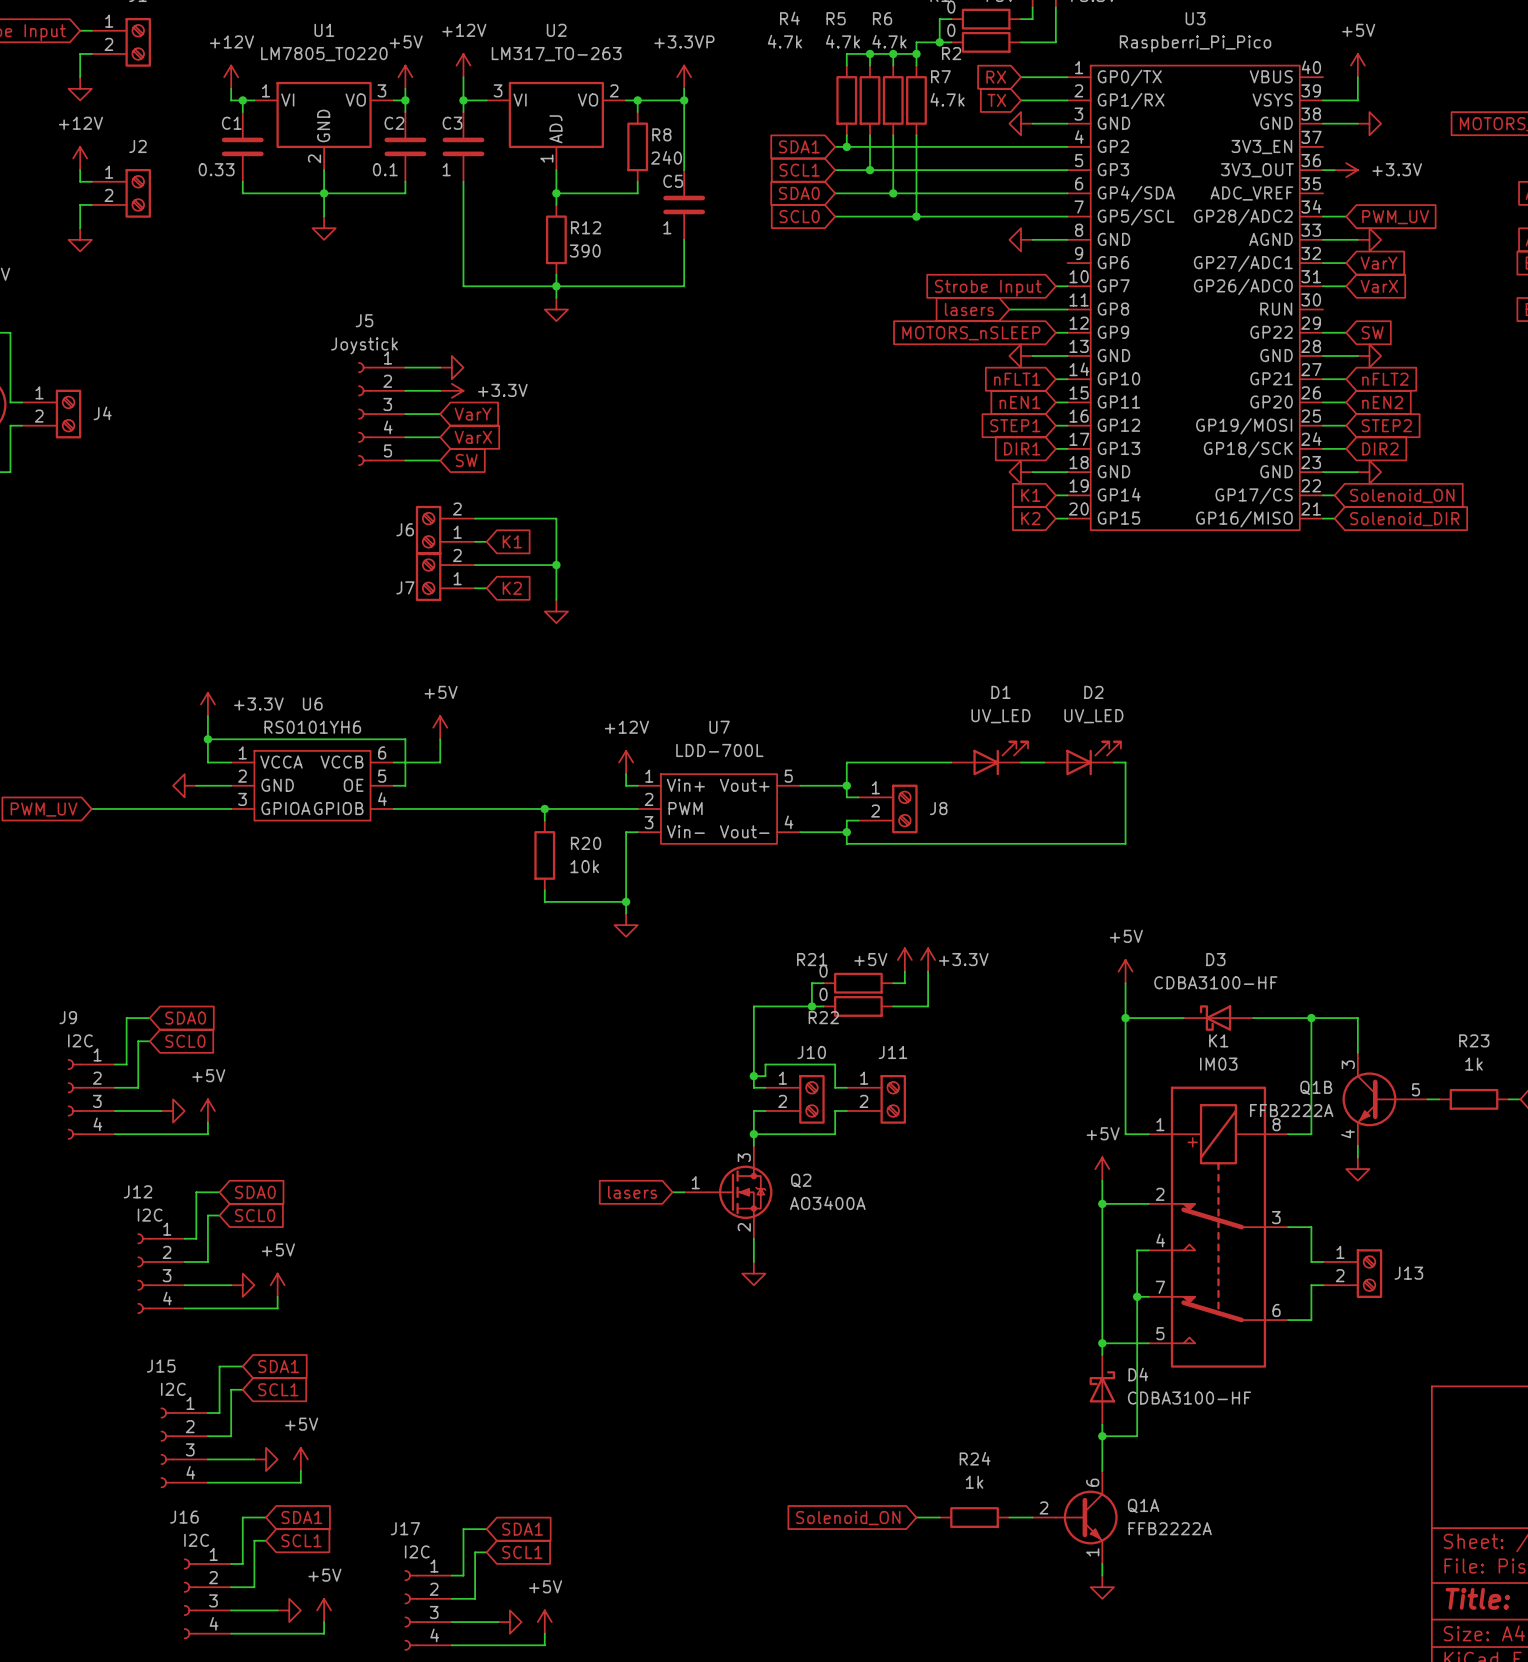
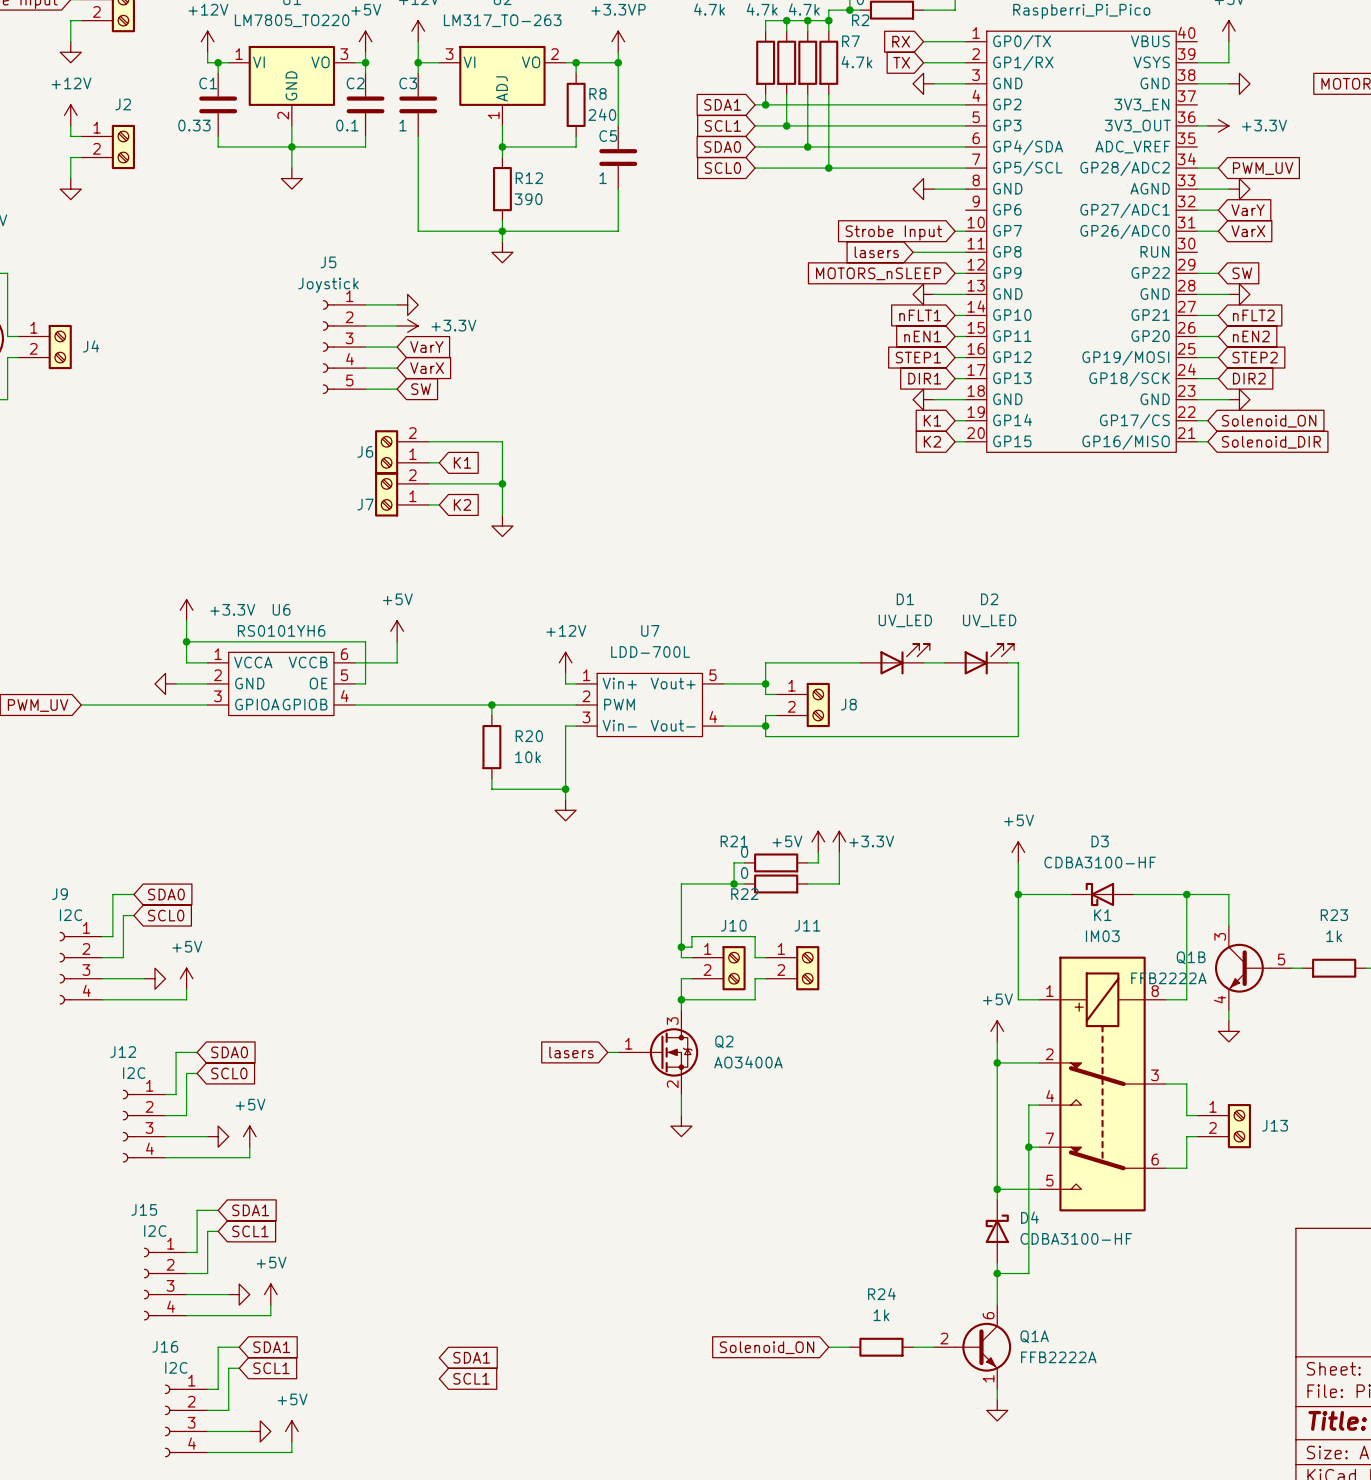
wire: (486, 1529) (463, 1529) (463, 1575) (451, 1575) -> none
wire: (486, 1552) (475, 1552) (475, 1598) (451, 1598) -> none
J17: I2C (428, 1610) -> none
wire: (451, 1622) (498, 1622) -> none
power symbol: (509, 1622) -> none
power symbol: +5V (544, 1622) -> none
wire: (544, 1633) (544, 1645) (451, 1645) -> none

